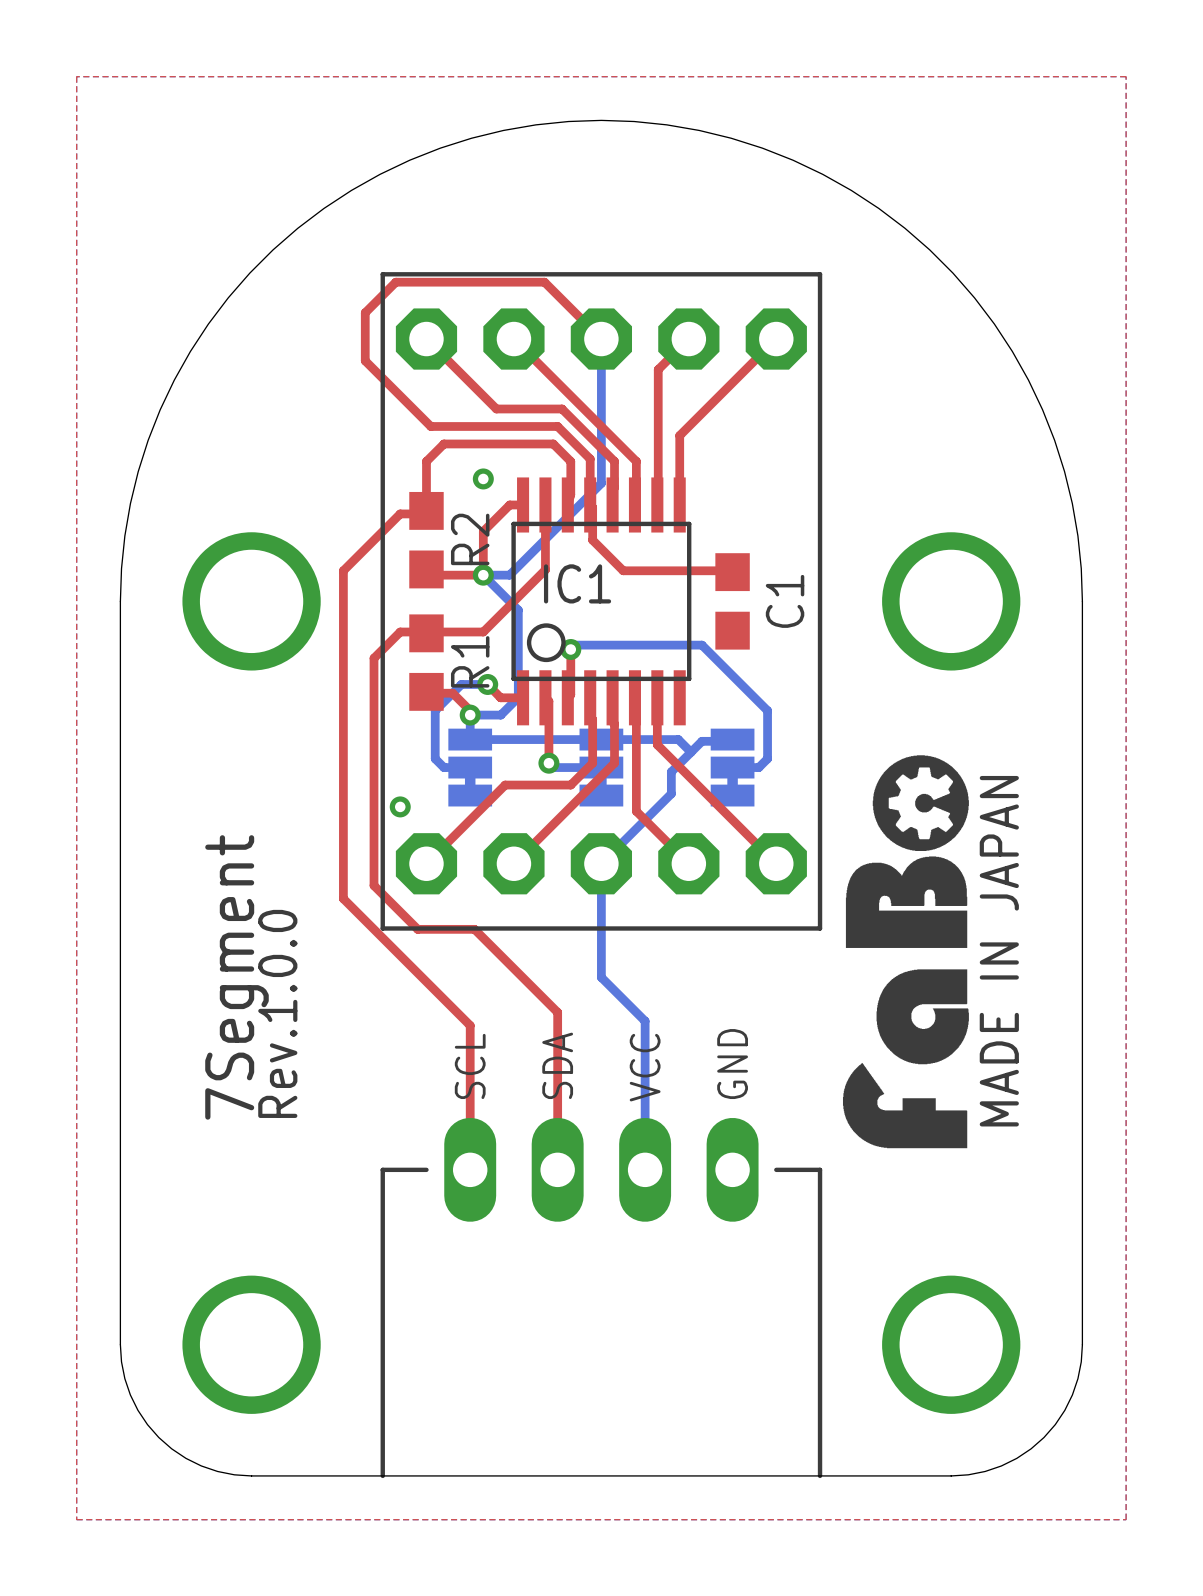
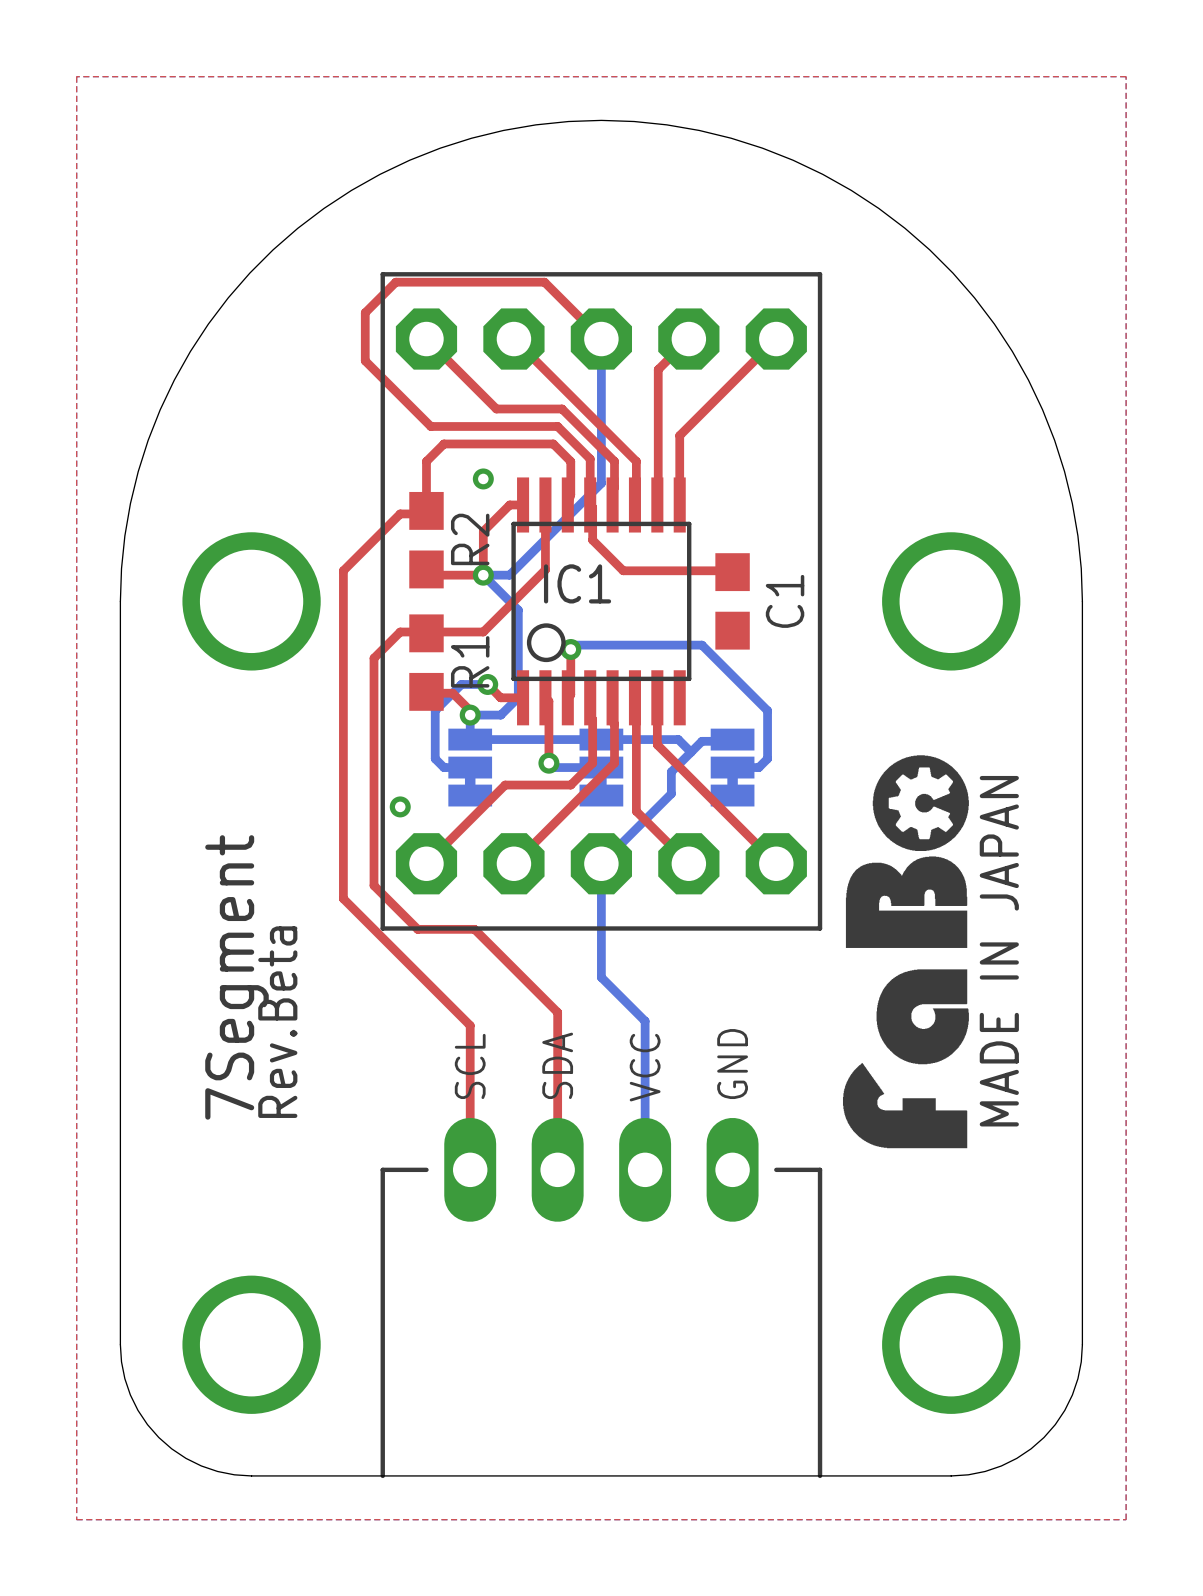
text: Rev.1.0.0 (277, 1013) -> Rev.Beta (277, 1022)

